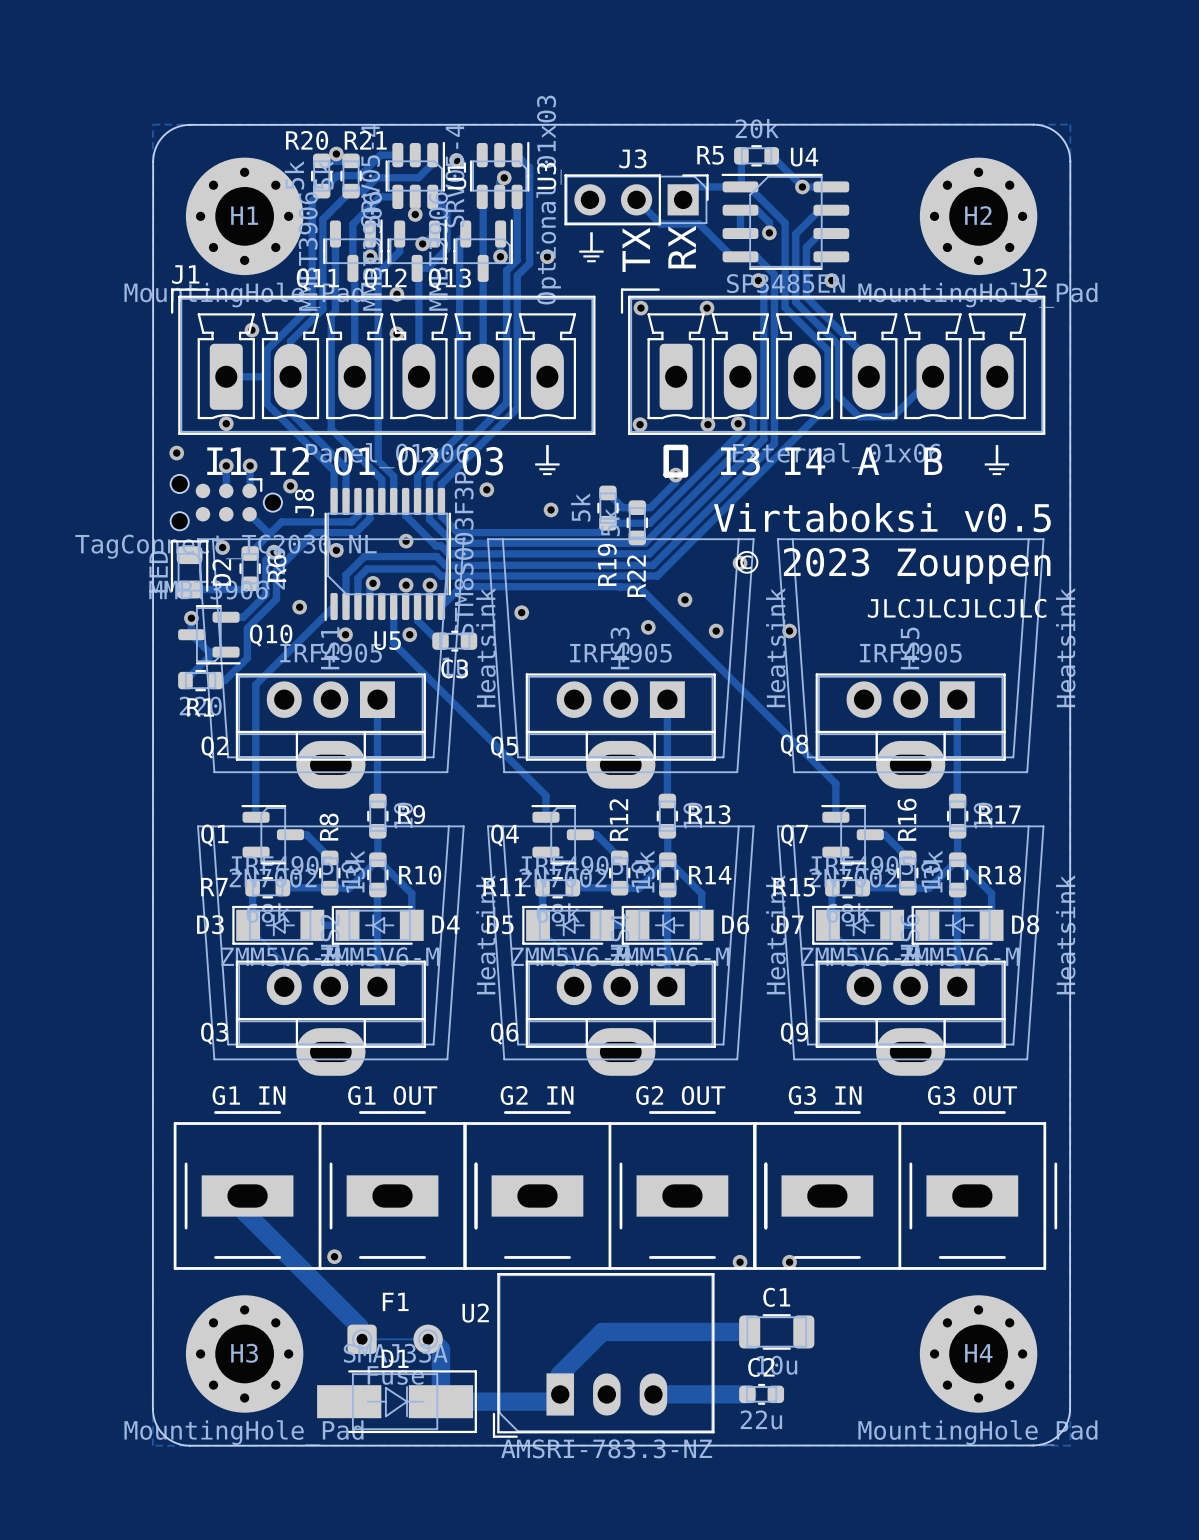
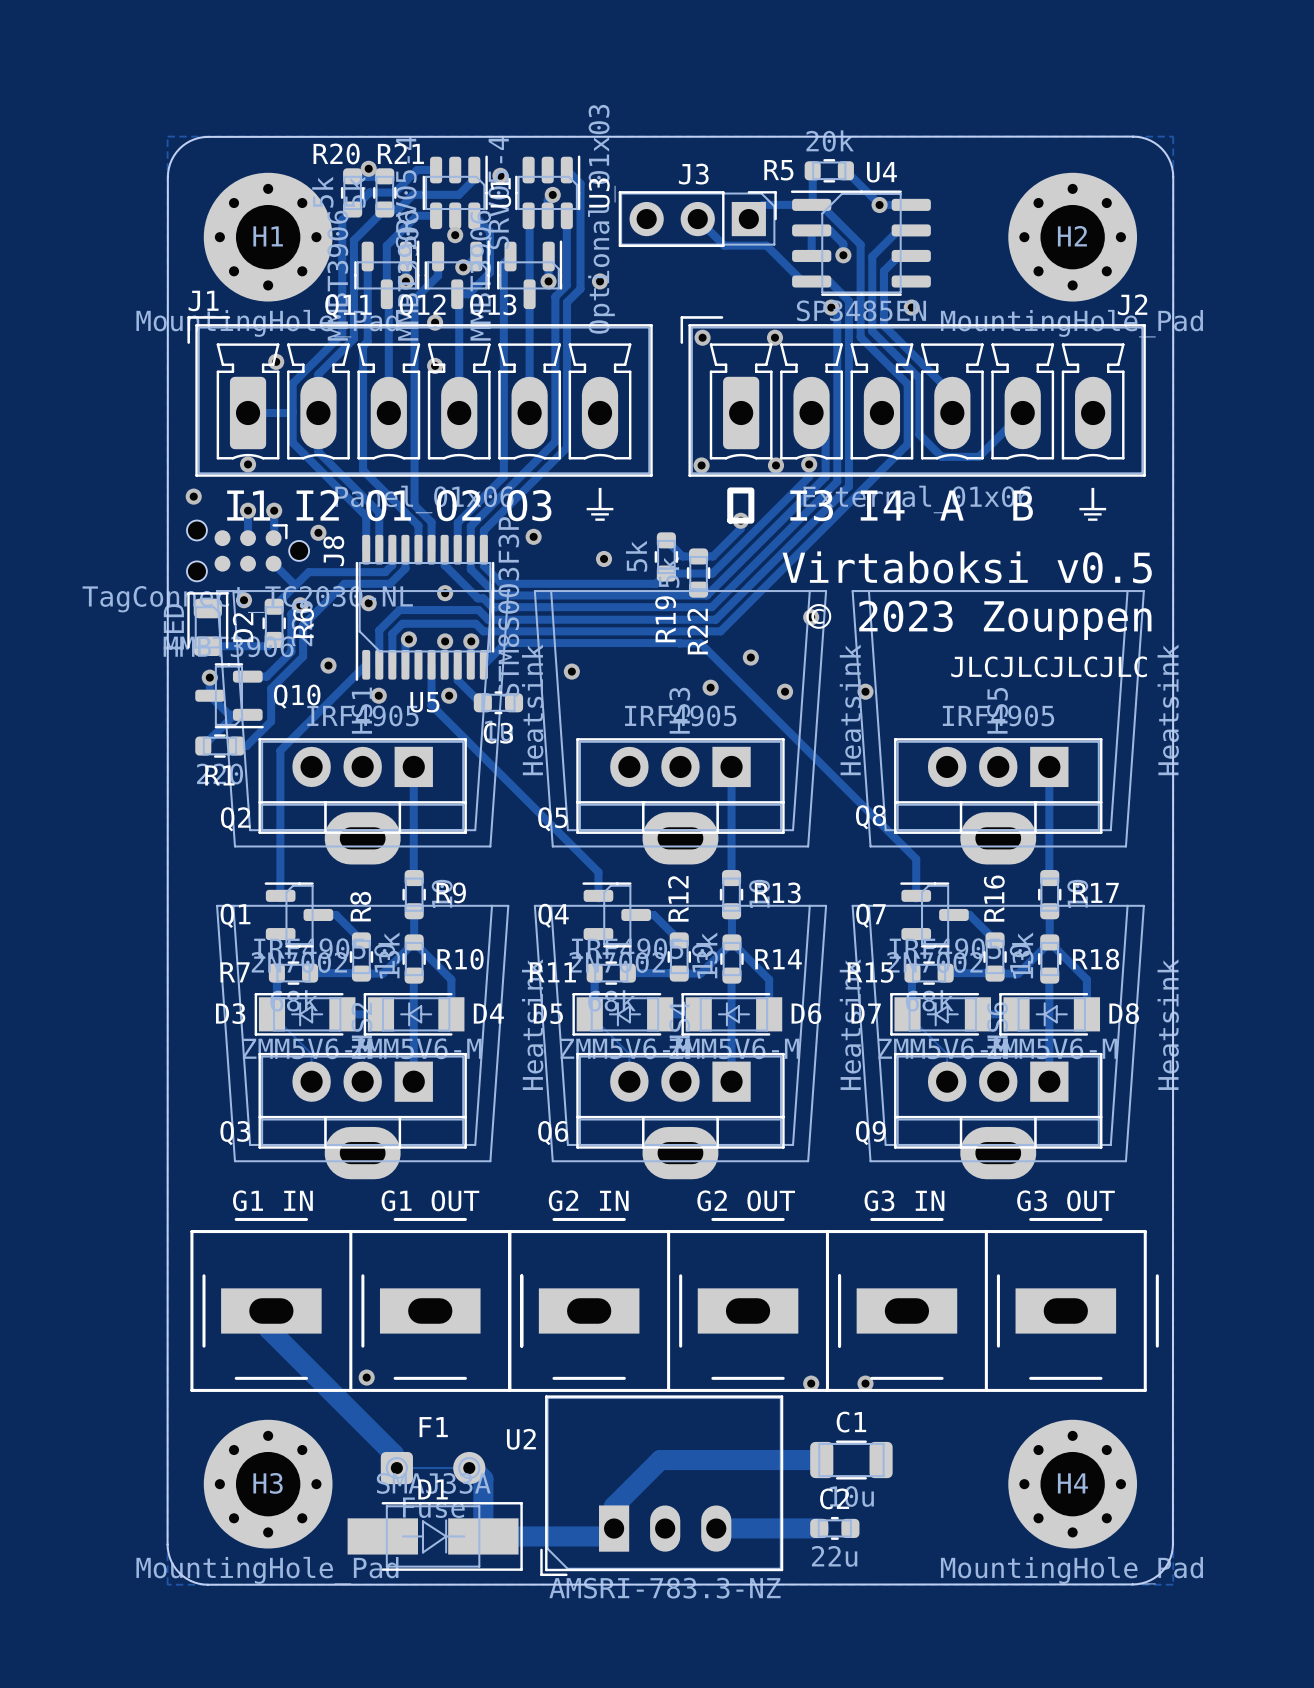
text: ⏚ (591, 247) -> none
text: RX (682, 247) -> none
text: TX (636, 249) -> none

